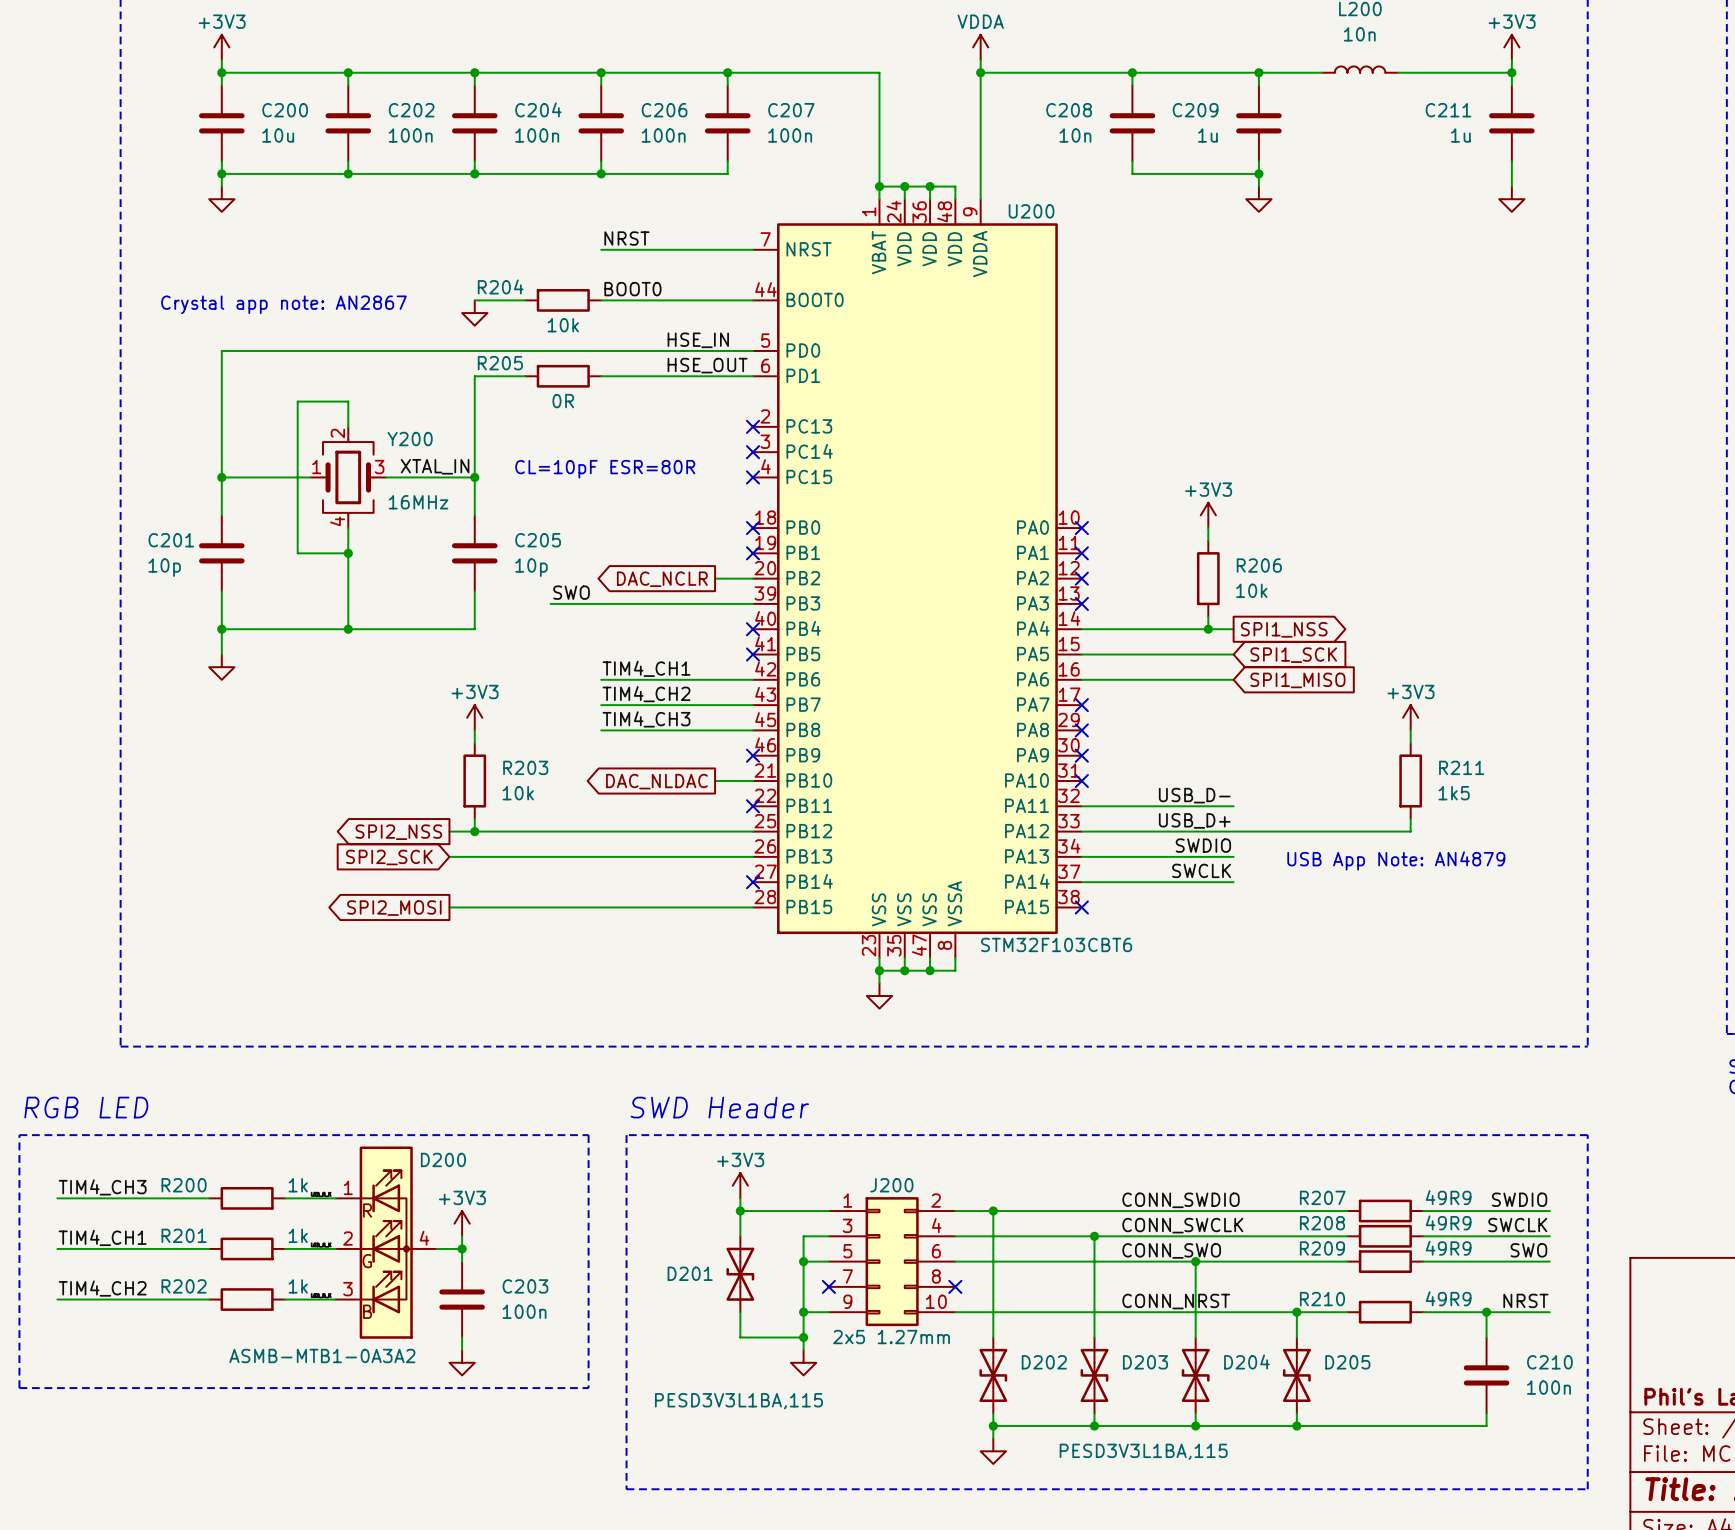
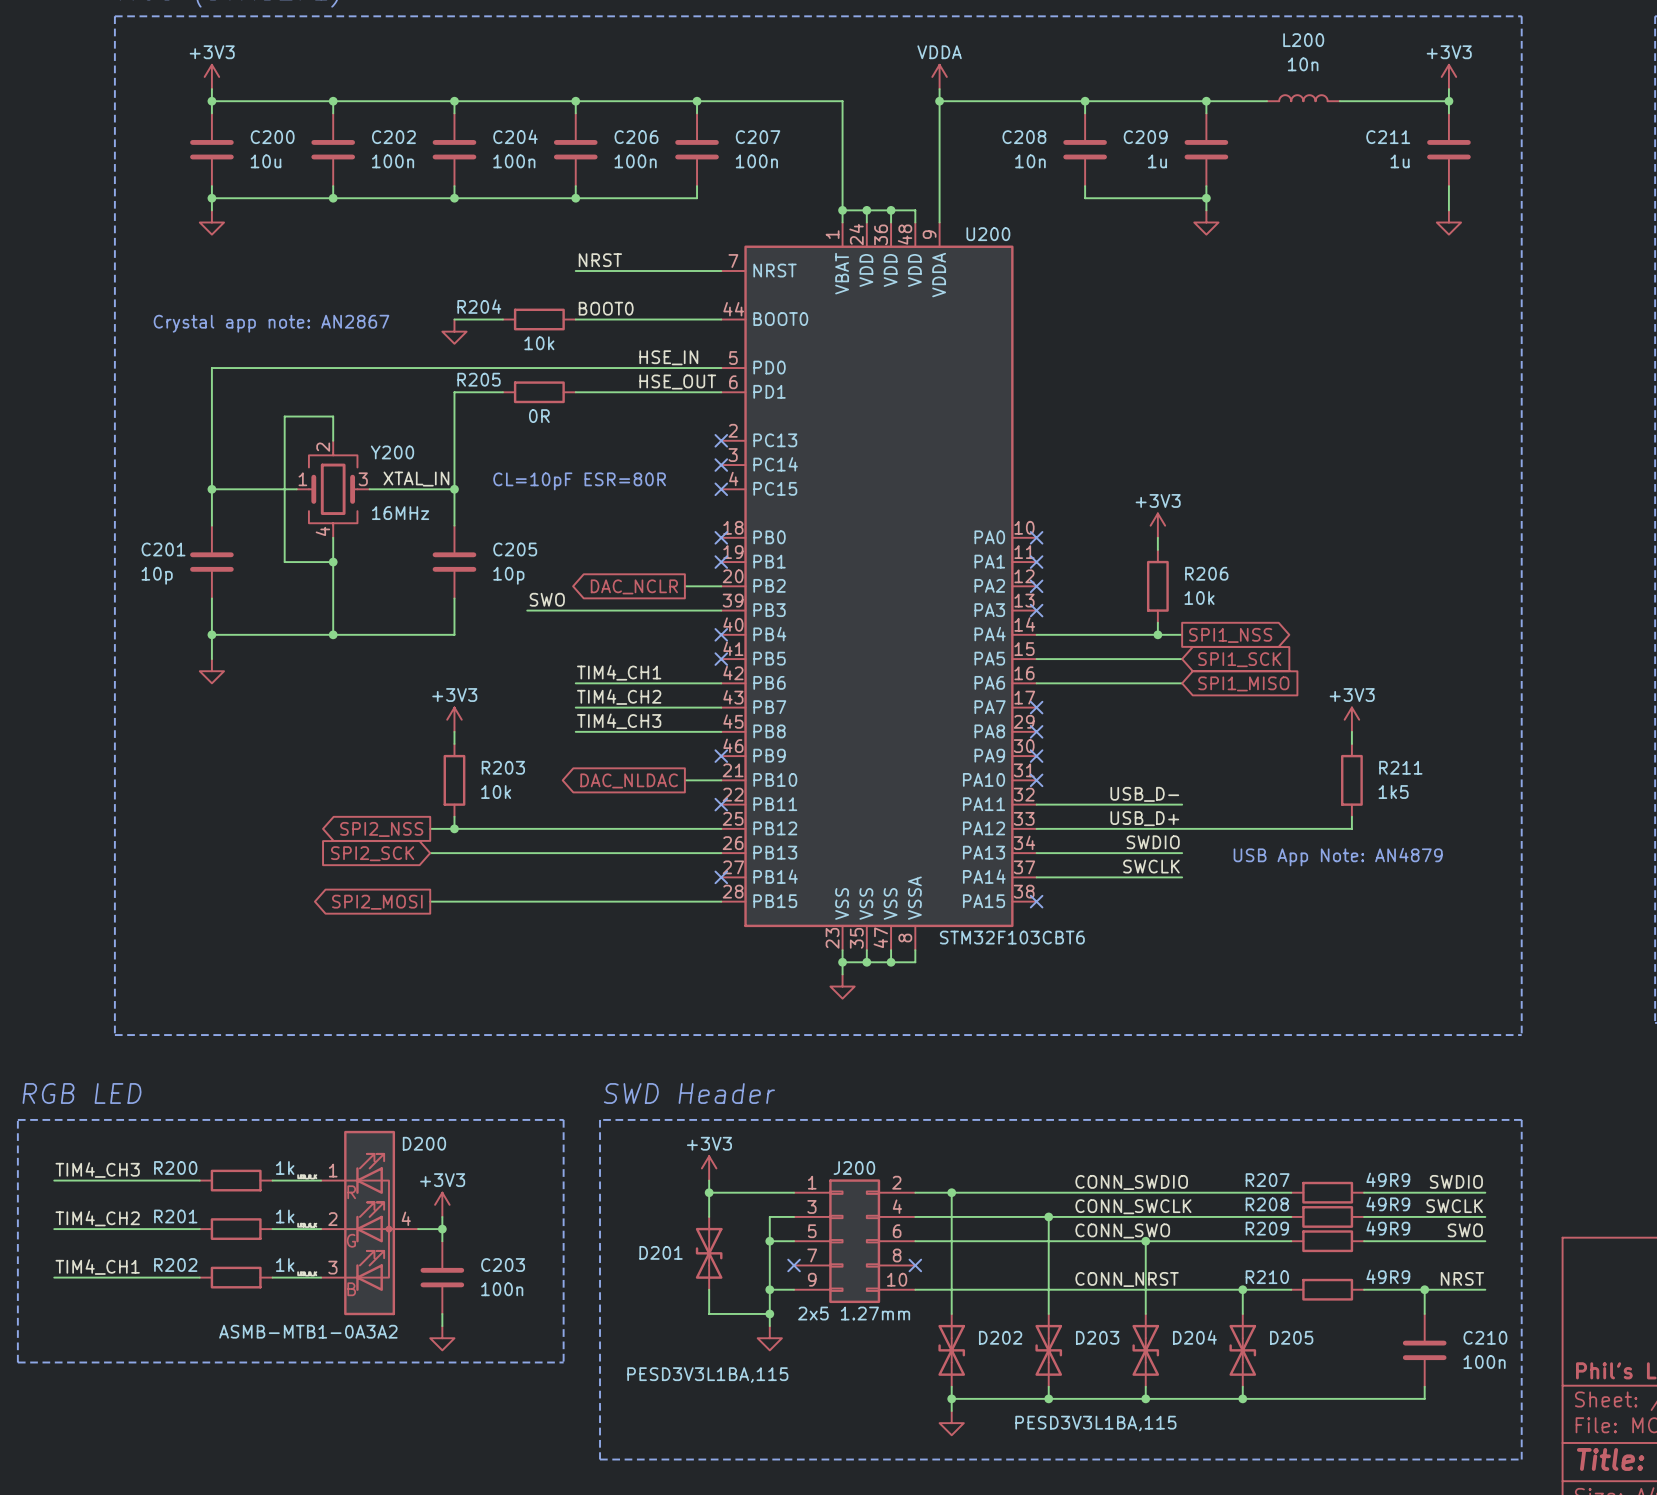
label: TIM4_CH1 (102, 1237) -> TIM4_CH2 (97, 1218)
label: TIM4_CH2 (102, 1288) -> TIM4_CH1 (97, 1267)

